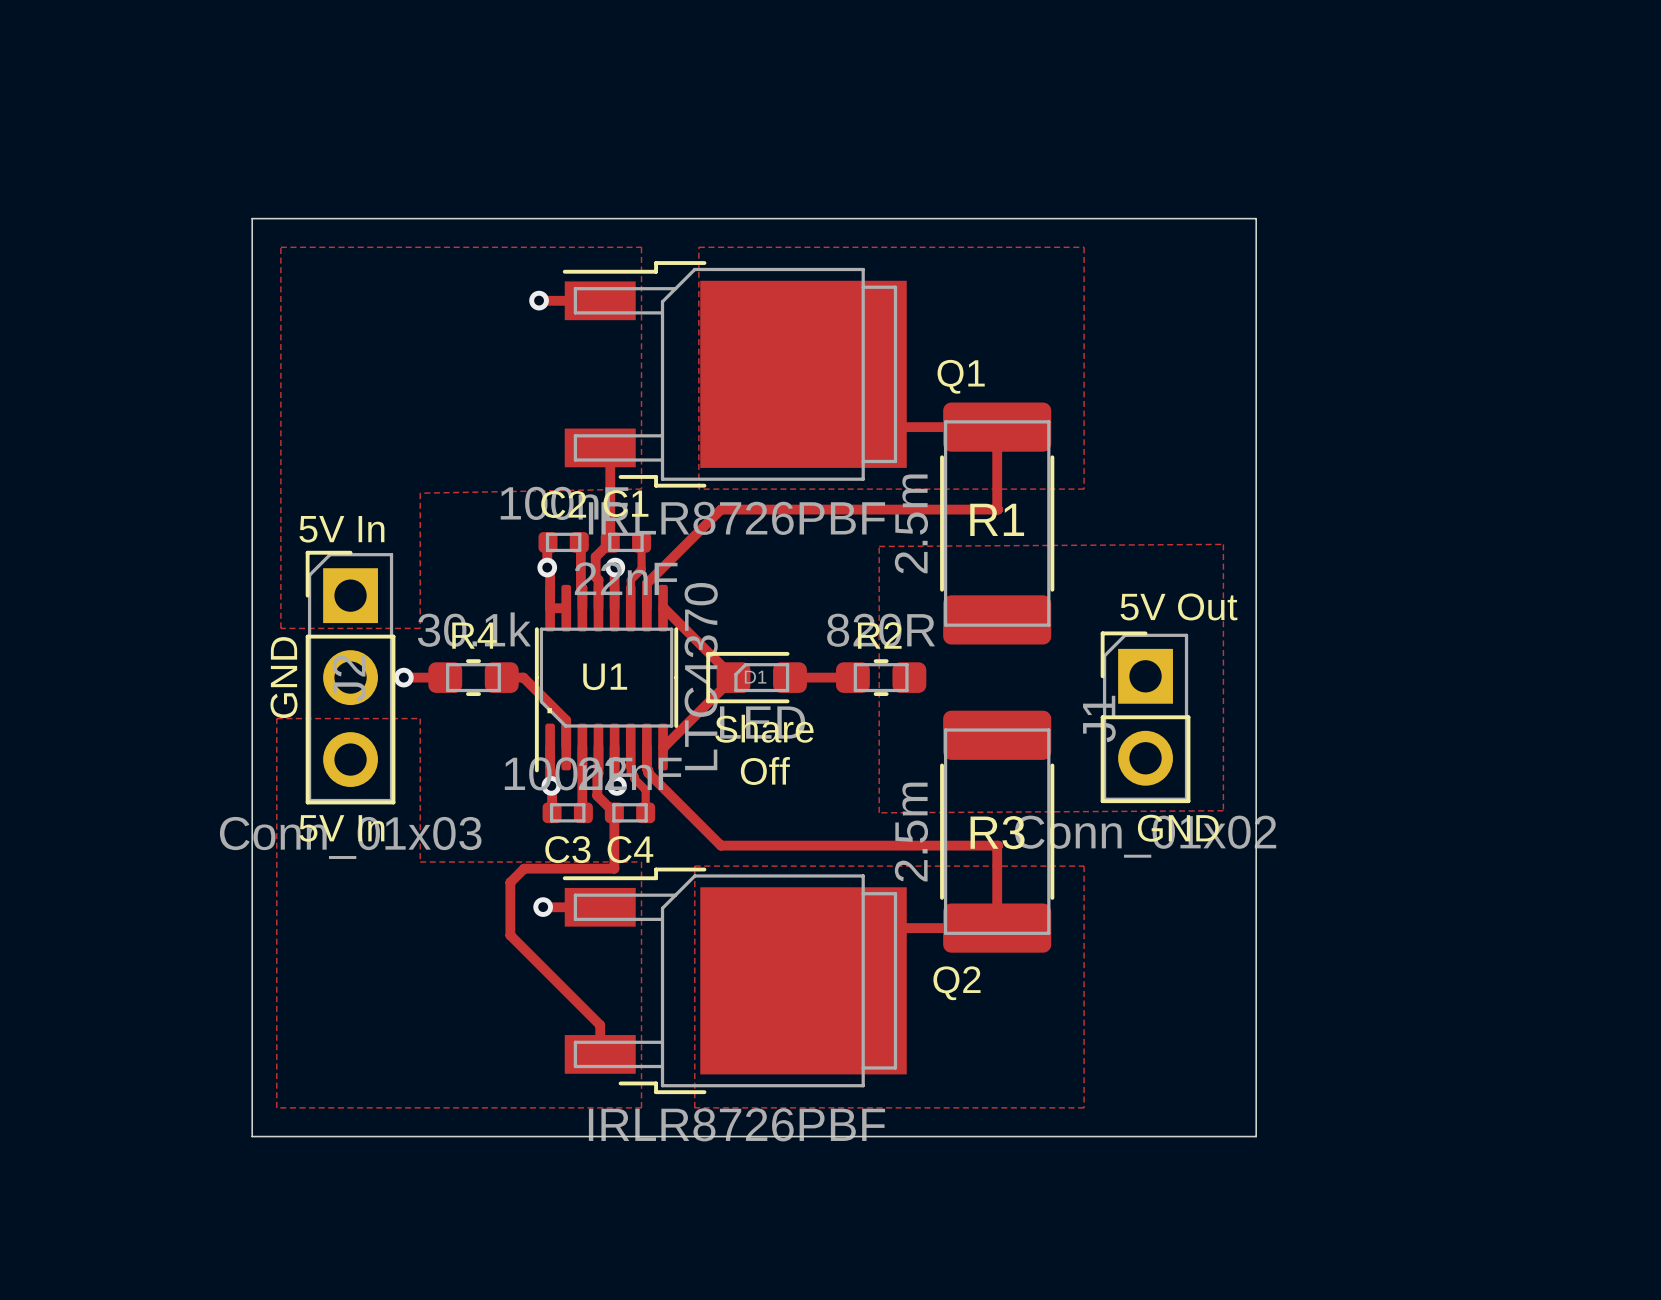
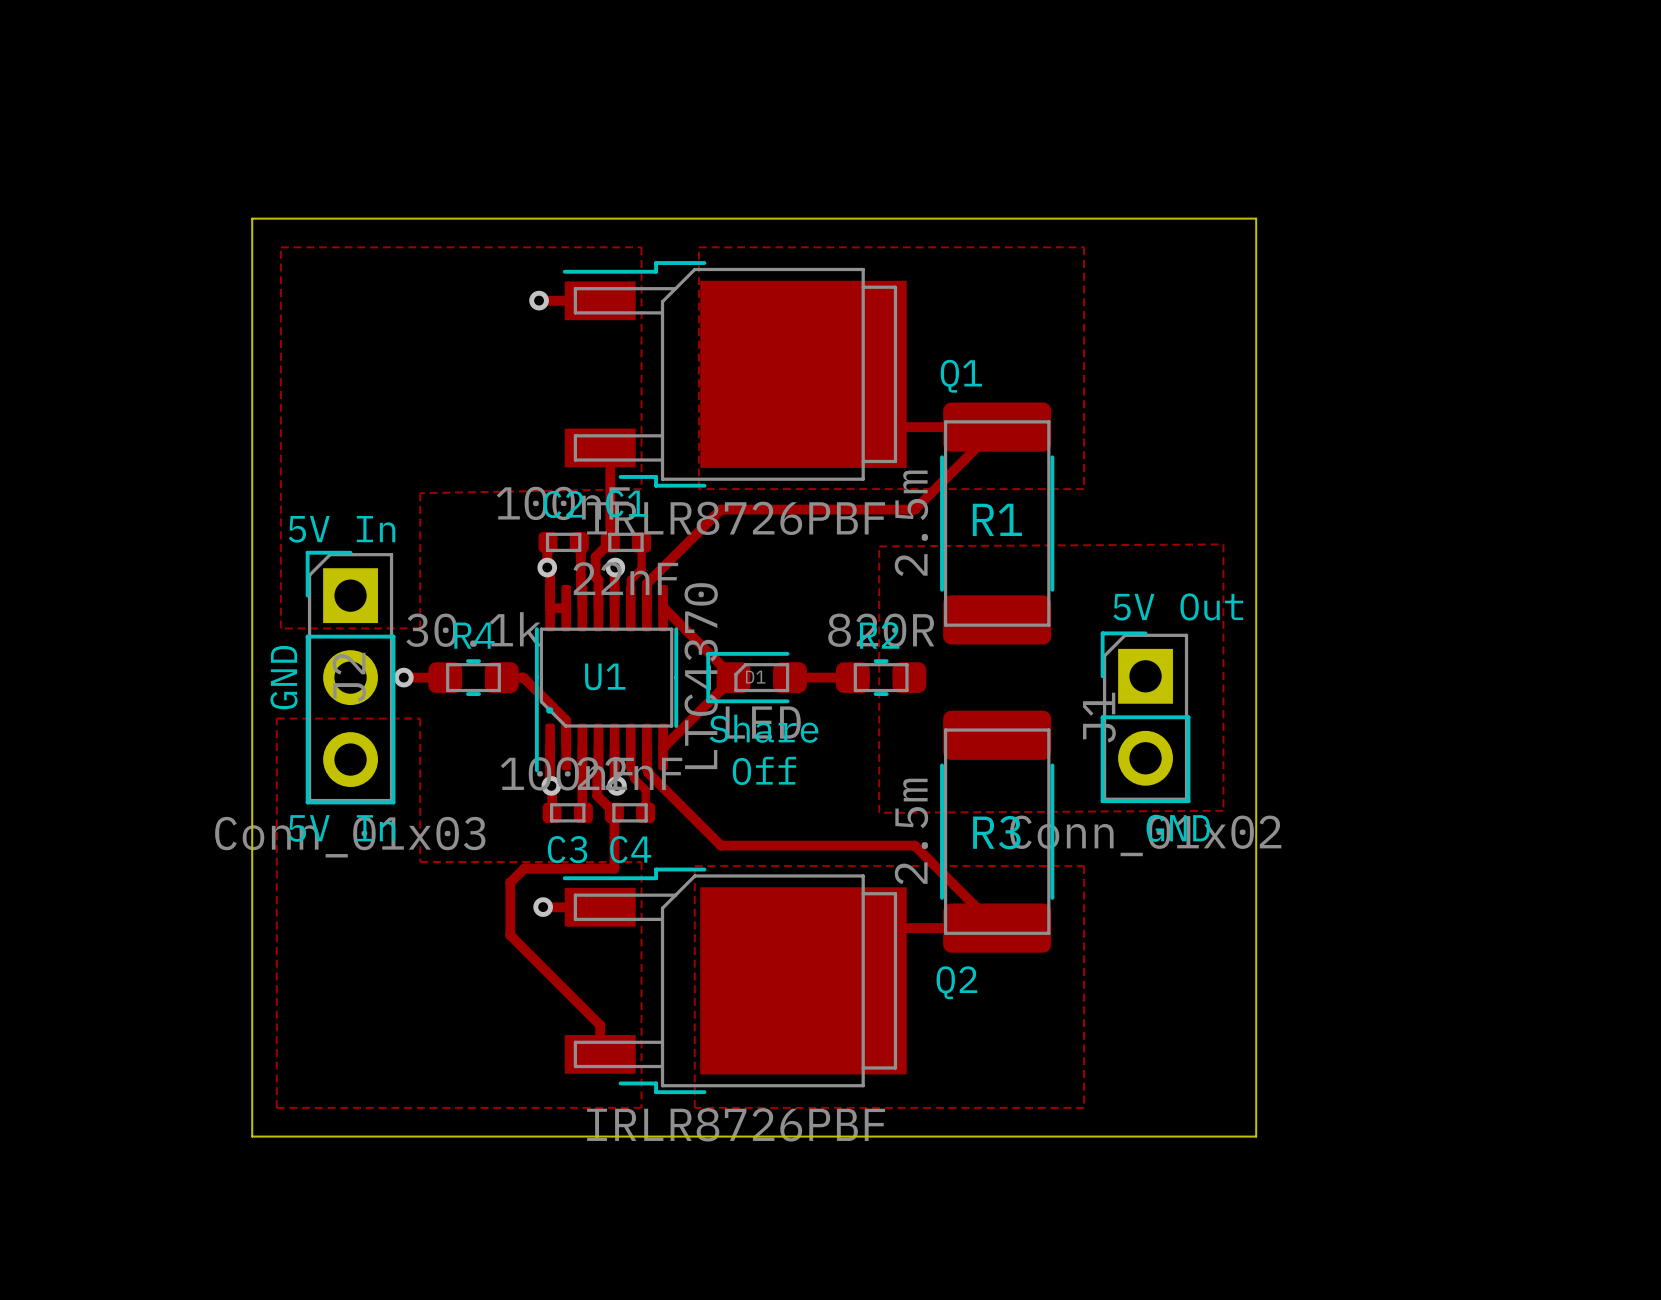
track: (997, 427) (998, 509) (914, 509) -> (997, 427) (914, 509)
track: (914, 845) (998, 845) (997, 928) -> (914, 845) (997, 928)

